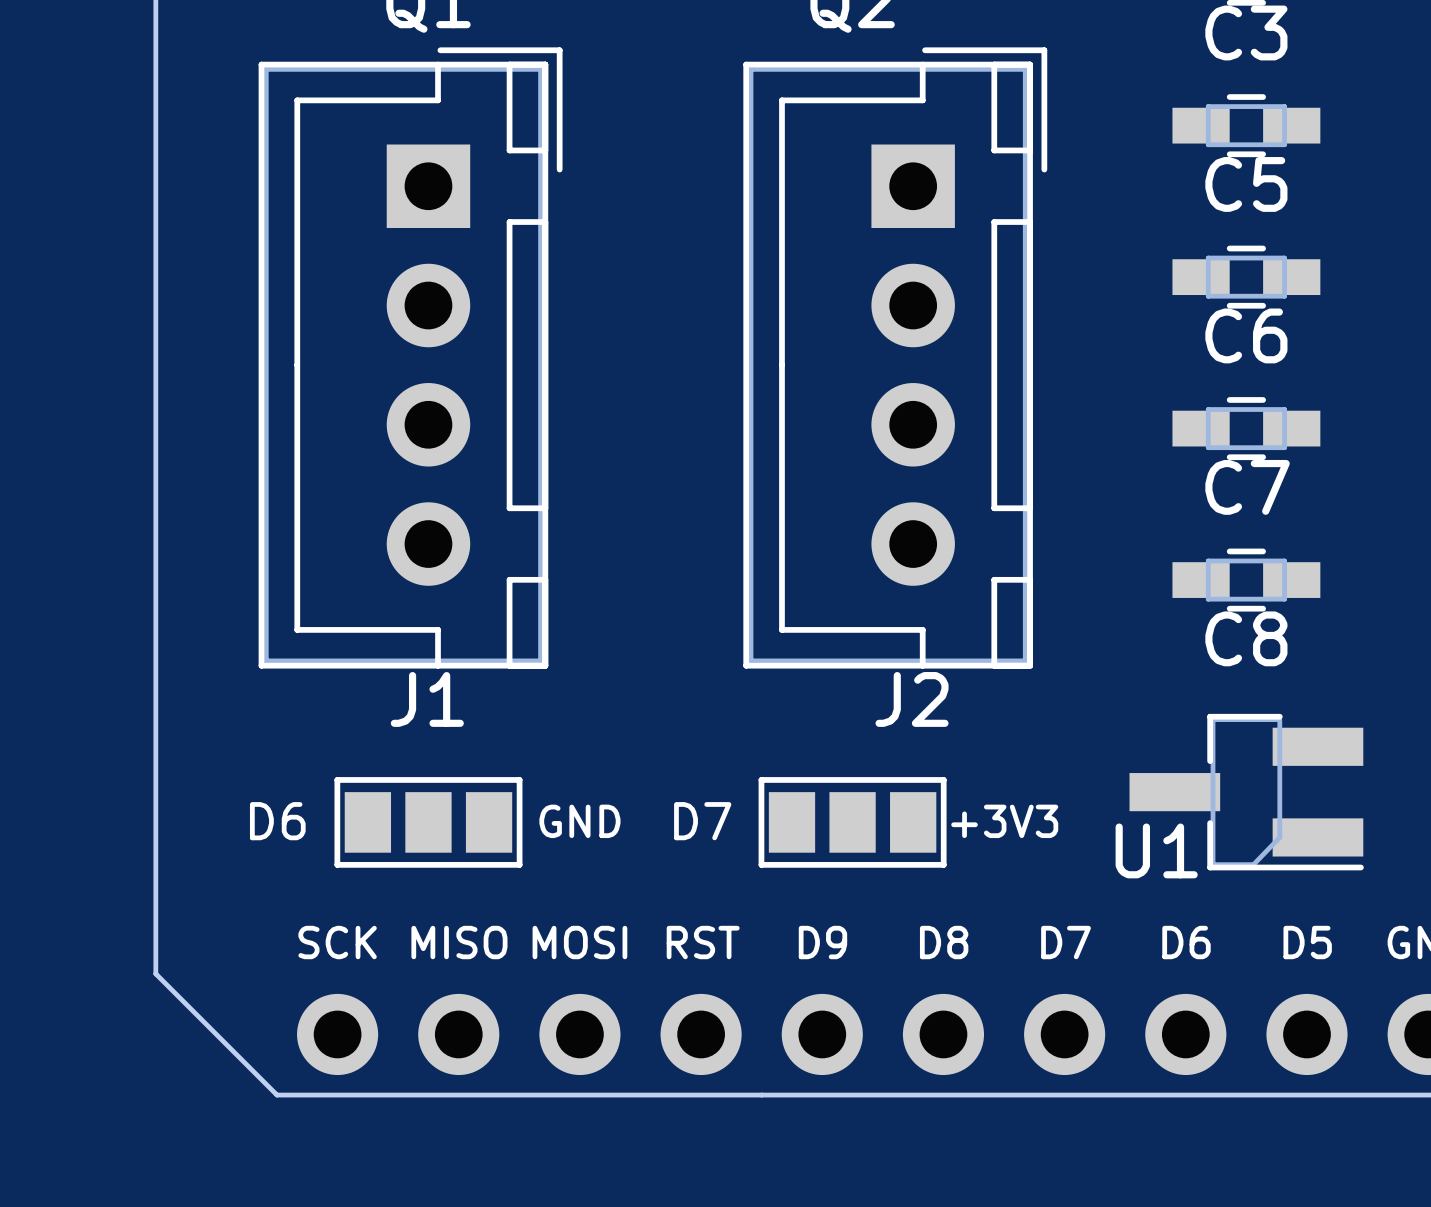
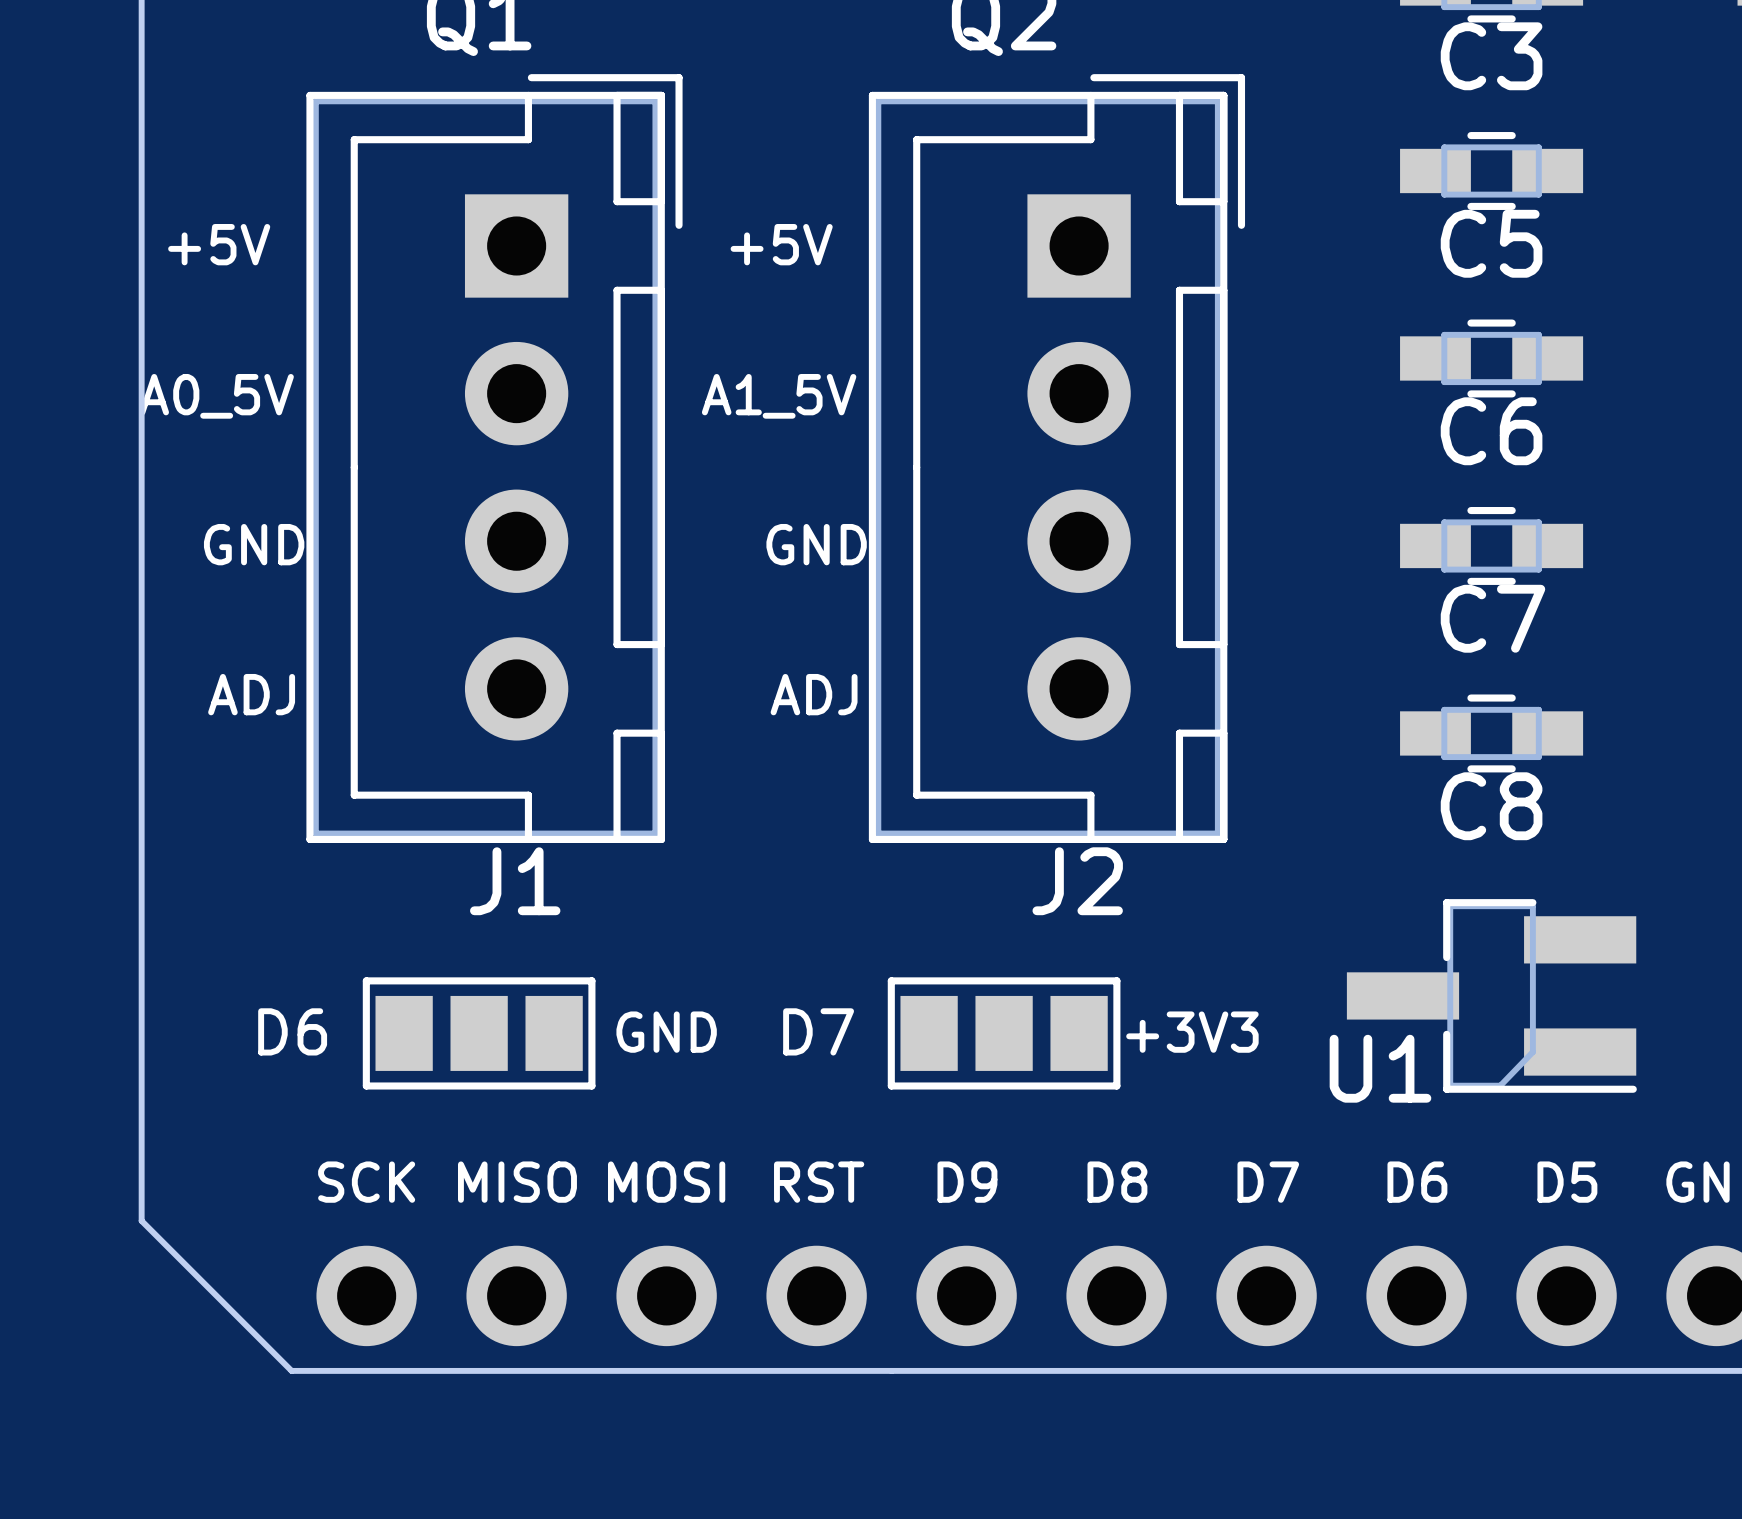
text: none -> +5V (219, 244)
text: none -> +5V (781, 244)
text: none -> A0_5V (216, 396)
text: none -> A1_5V (779, 396)
J1 position: (410, 357) -> (494, 458)
text: none -> GND (254, 544)
text: none -> GND (816, 544)
text: none -> ADJ (251, 694)
text: none -> ADJ (814, 694)

